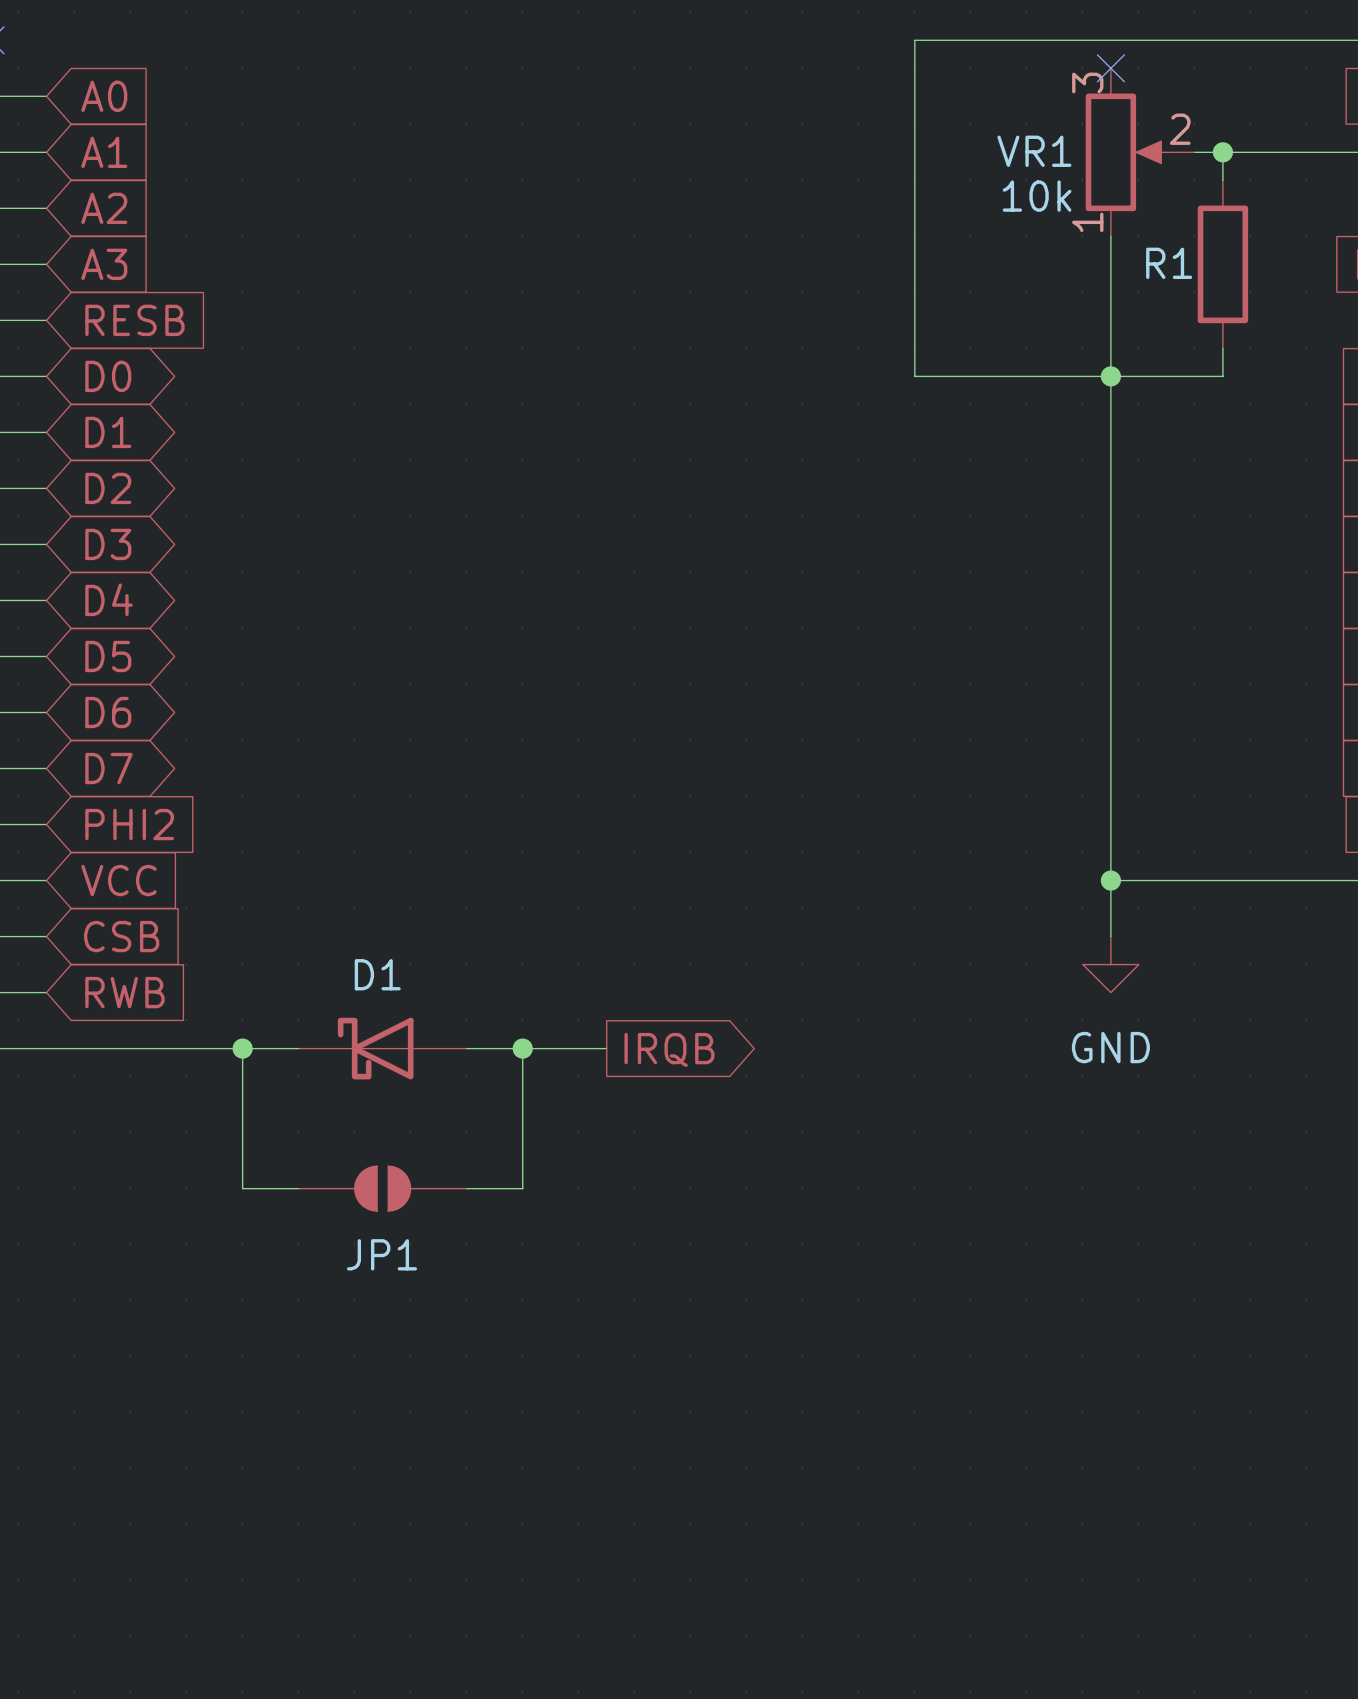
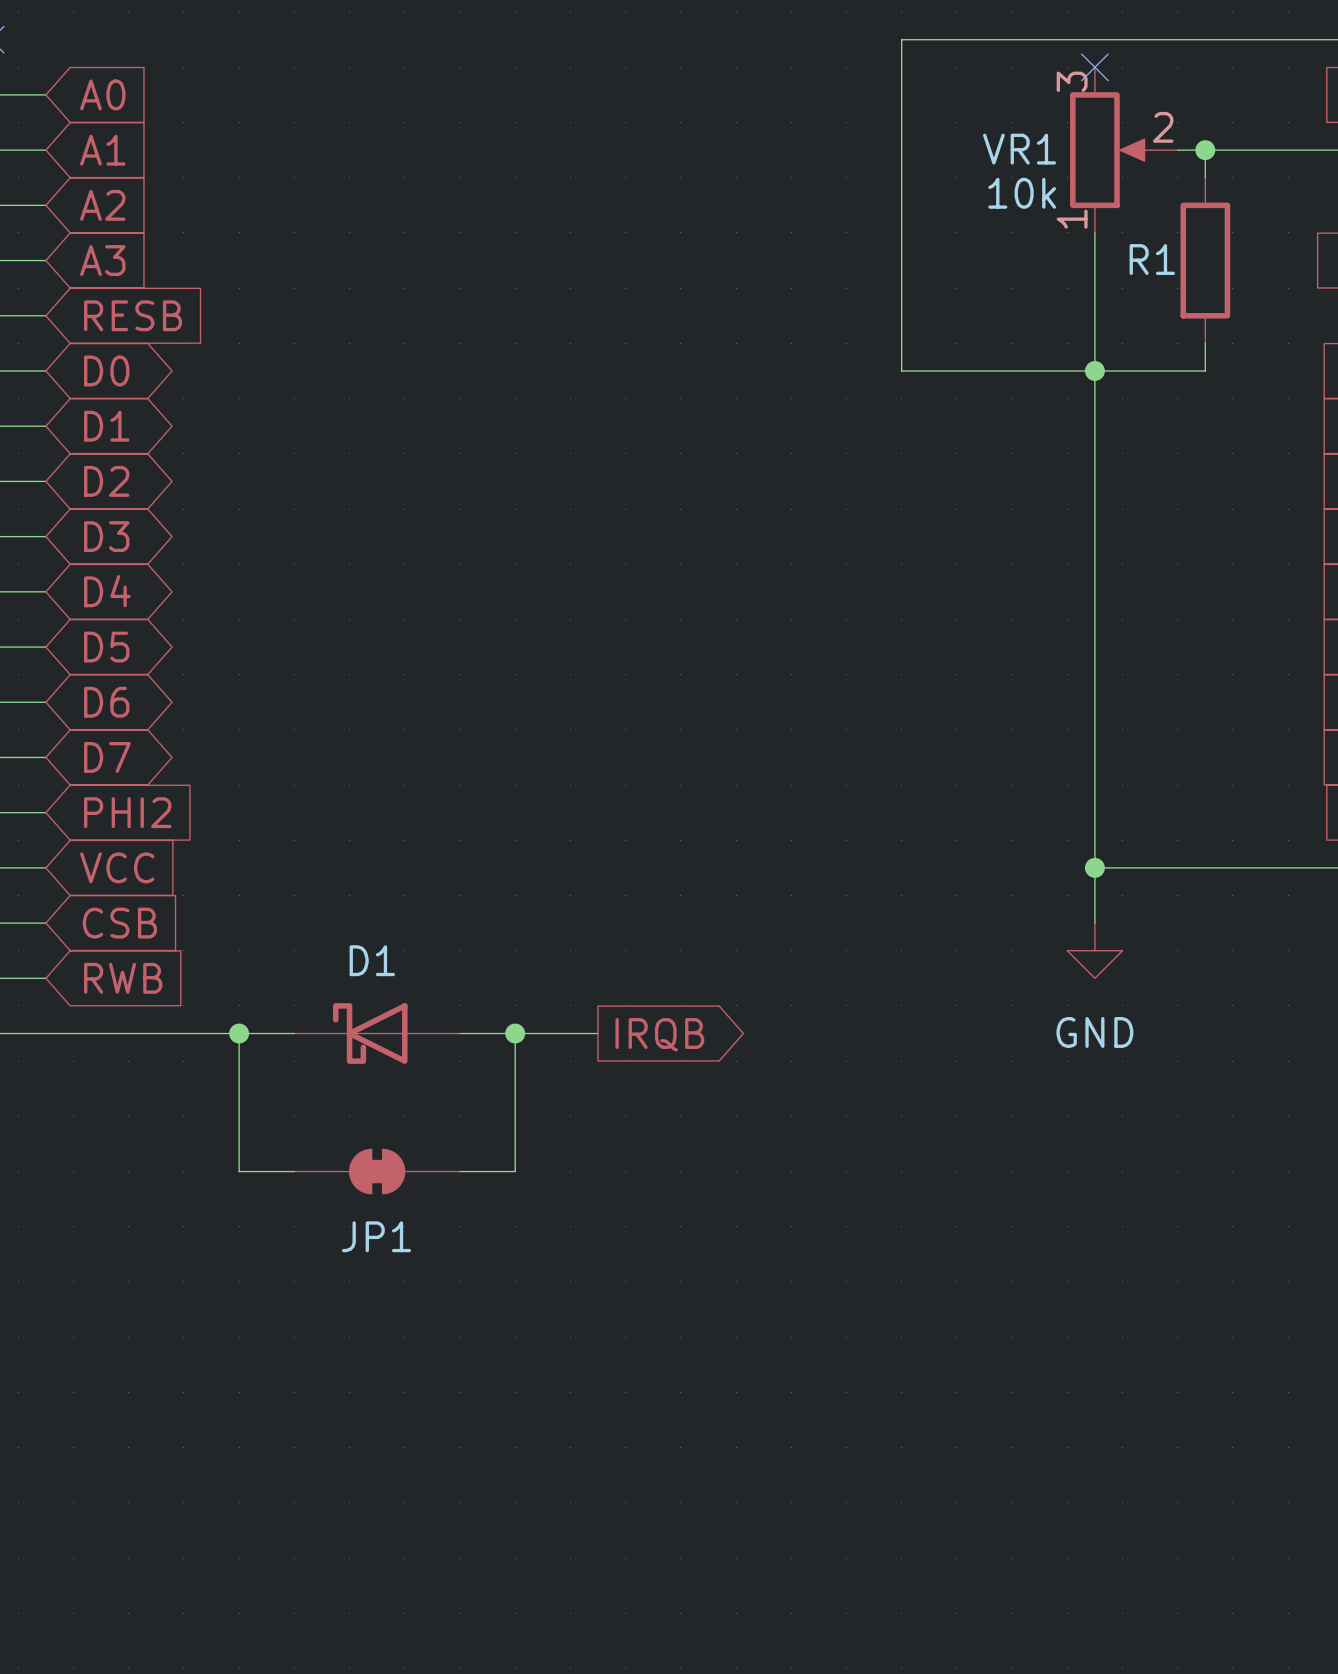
JP1 symbol: [298, 1166, 467, 1212] -> [294, 1149, 460, 1194]

